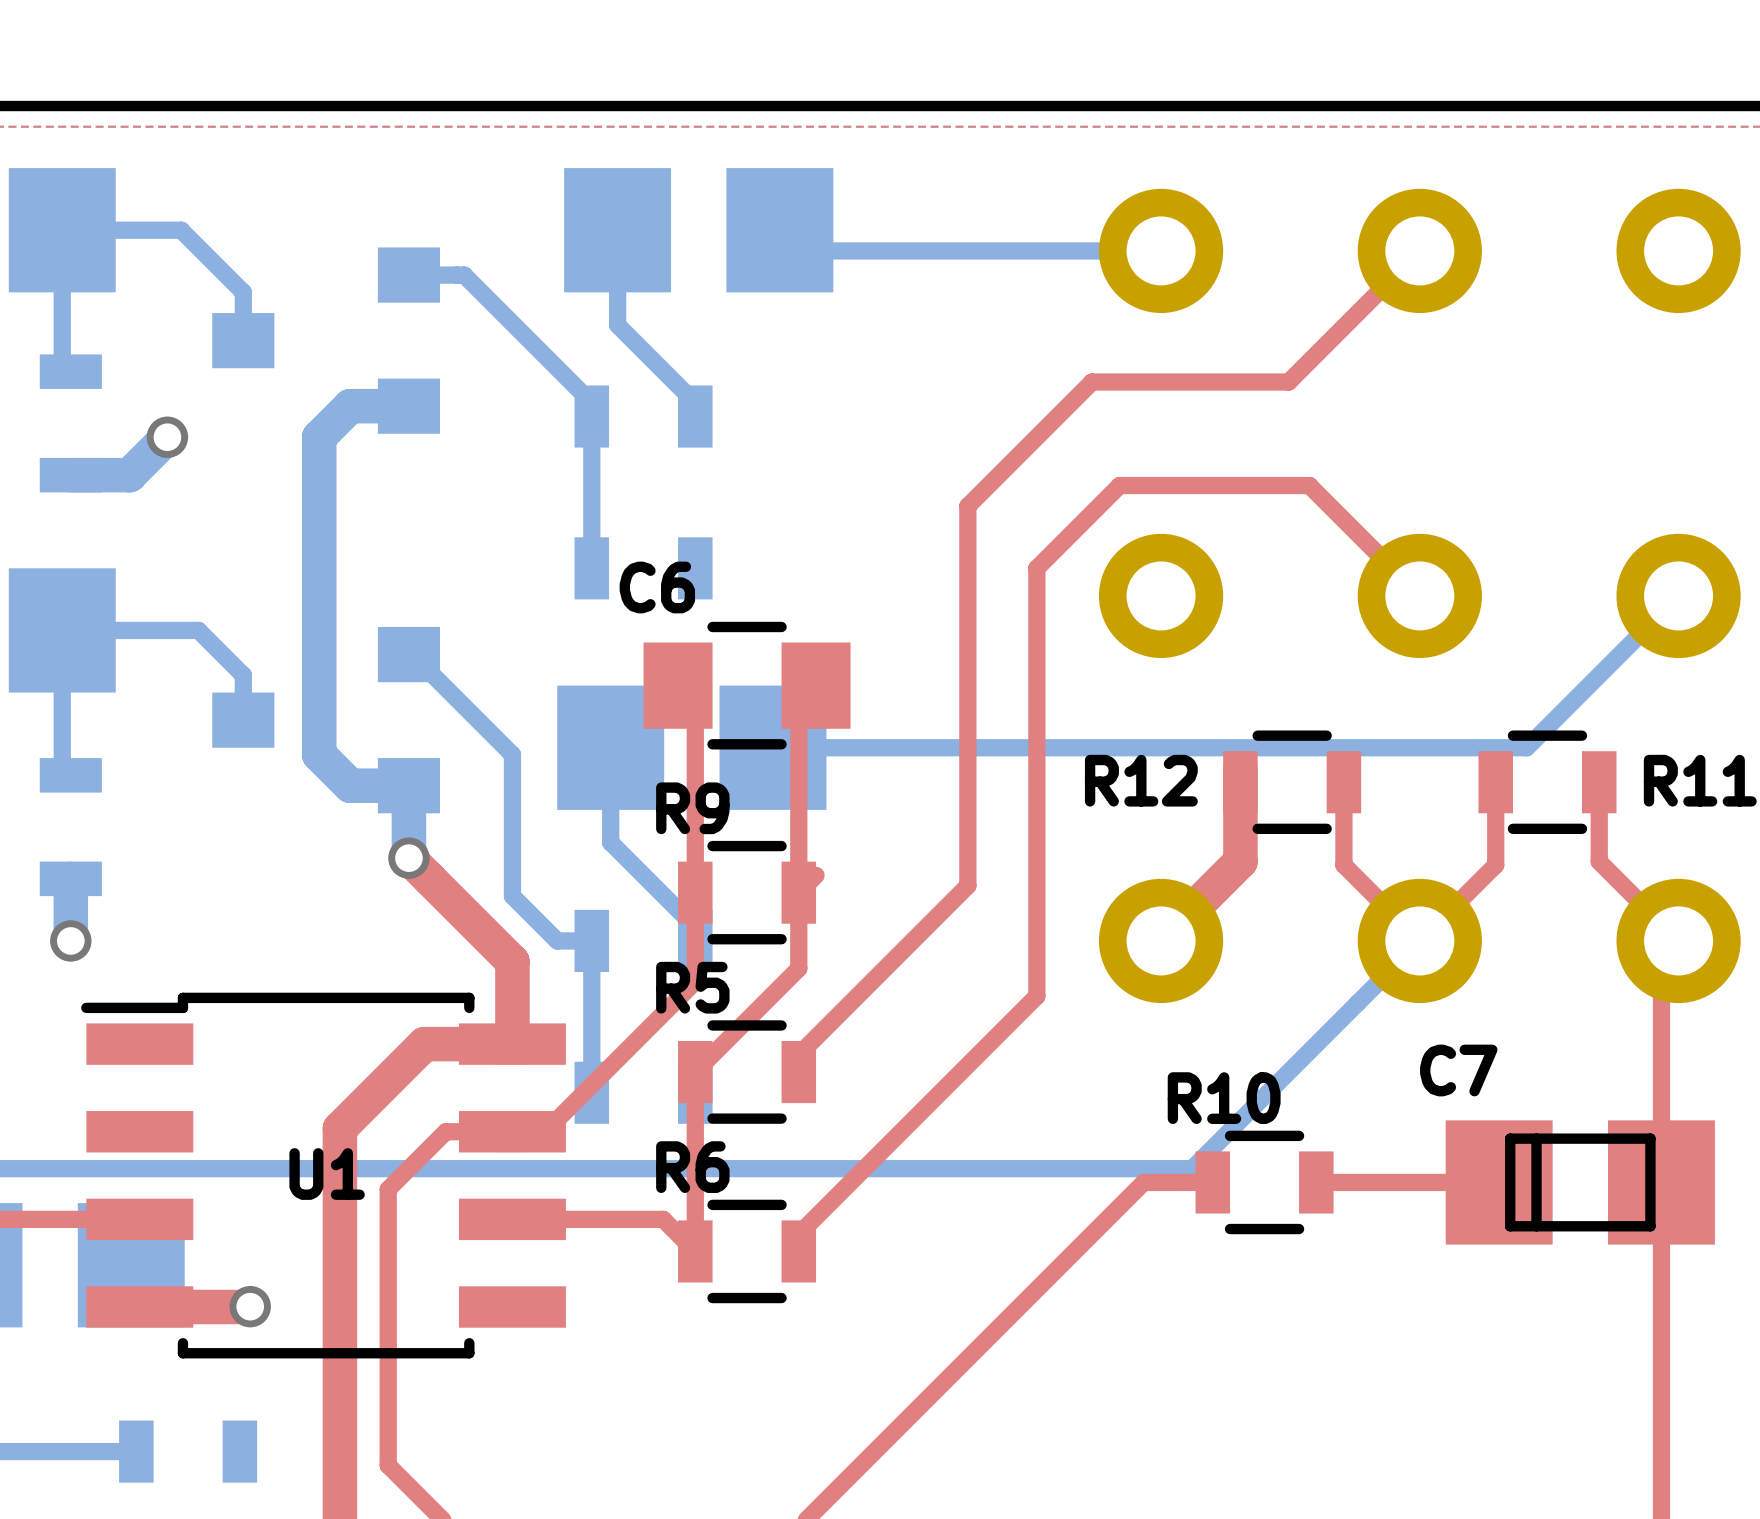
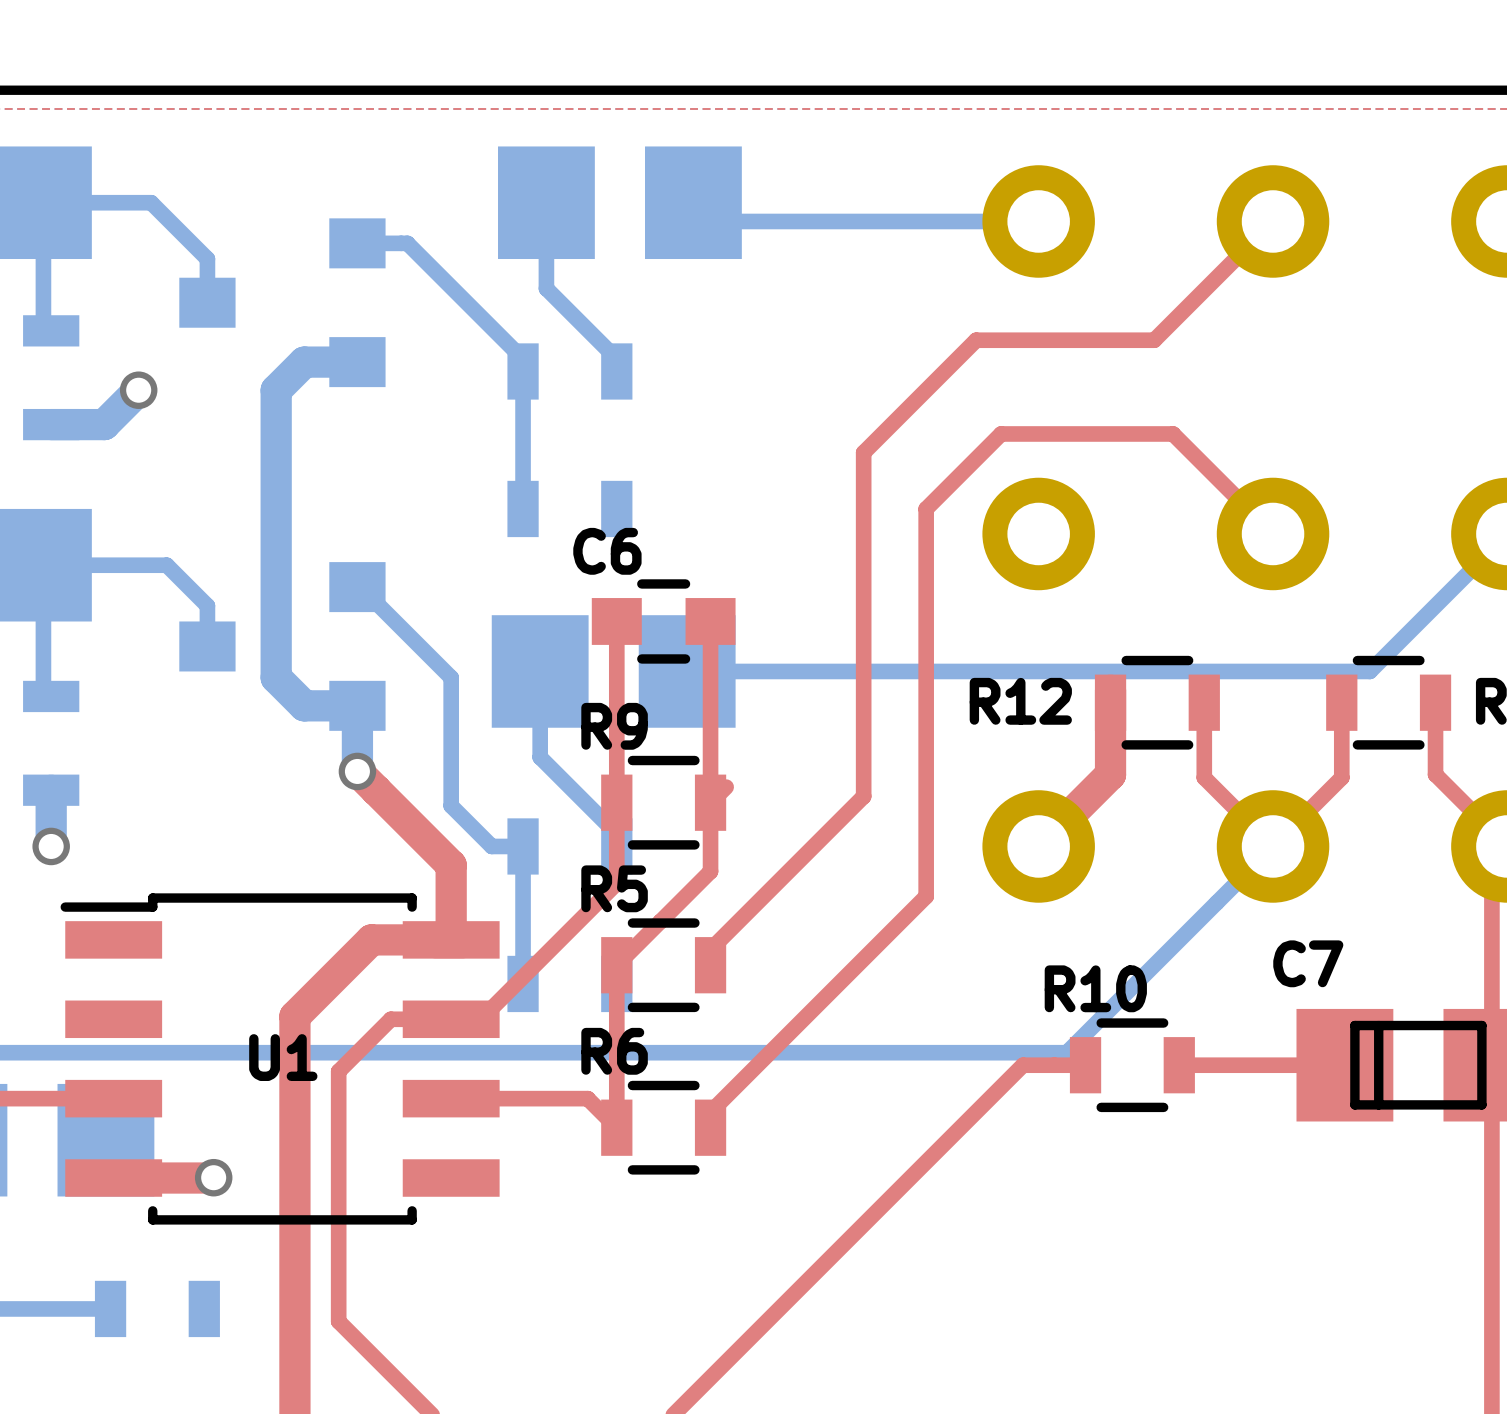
C6 name position: C6 (657, 587) -> C6 (607, 551)
C6 footprint: [643, 621, 851, 750] -> [591, 579, 736, 664]

